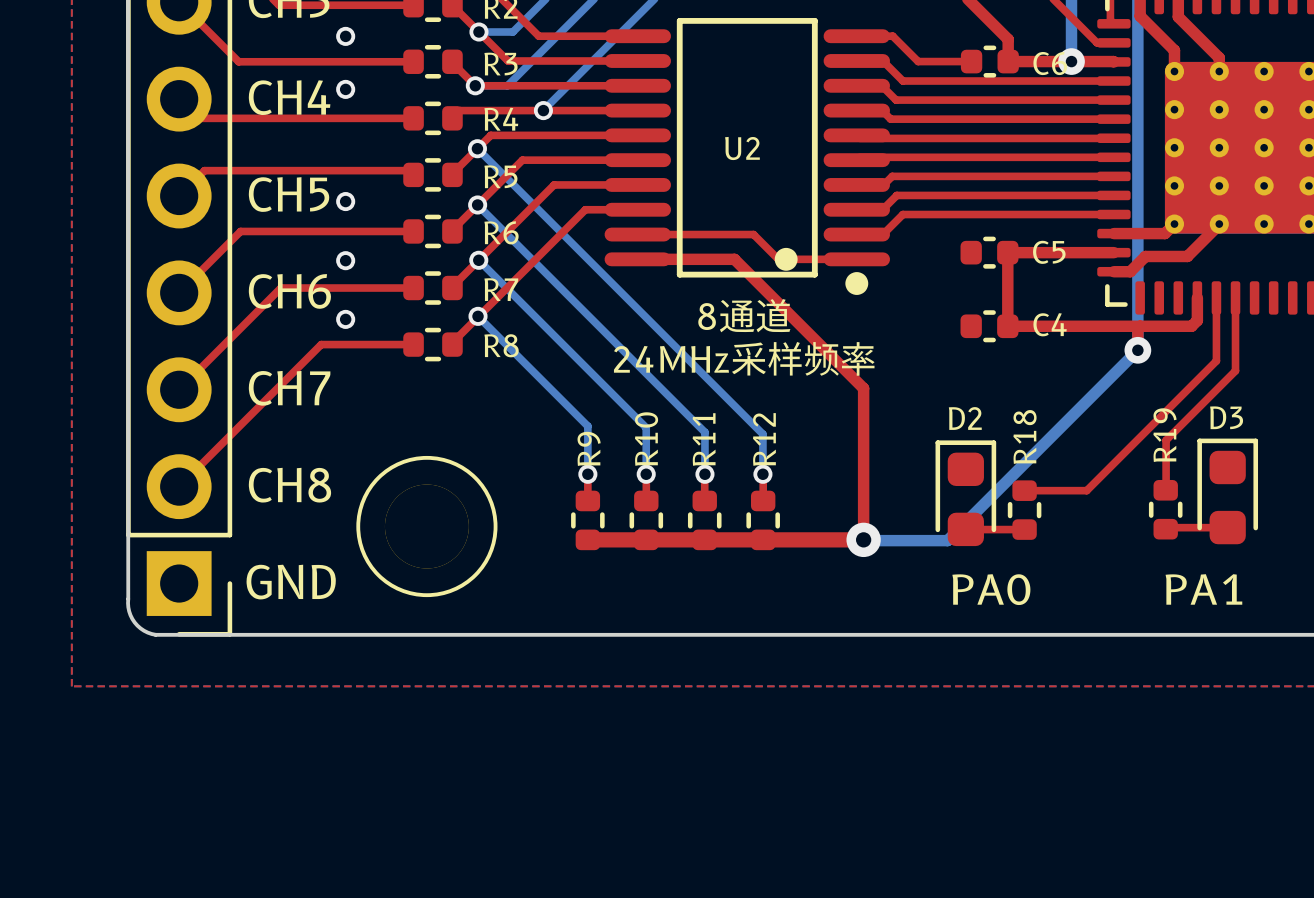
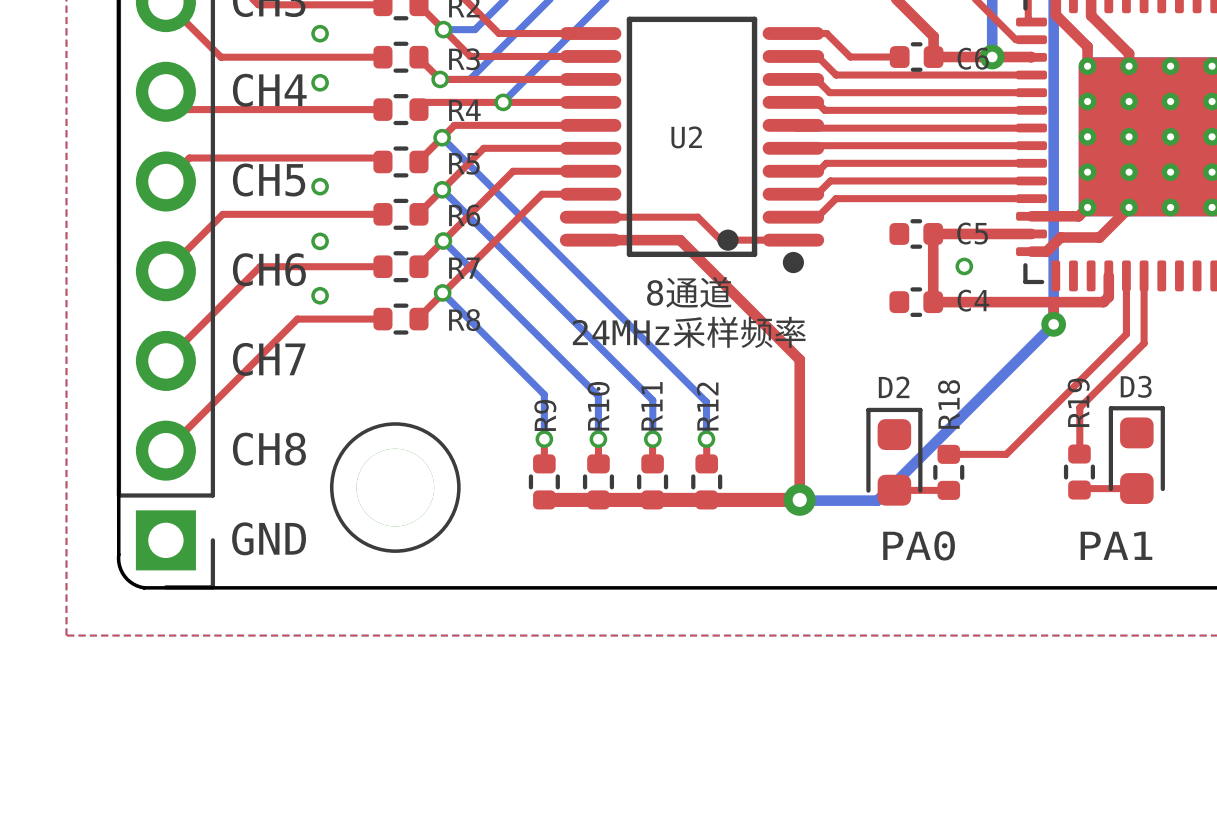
via: none -> (964, 266)

